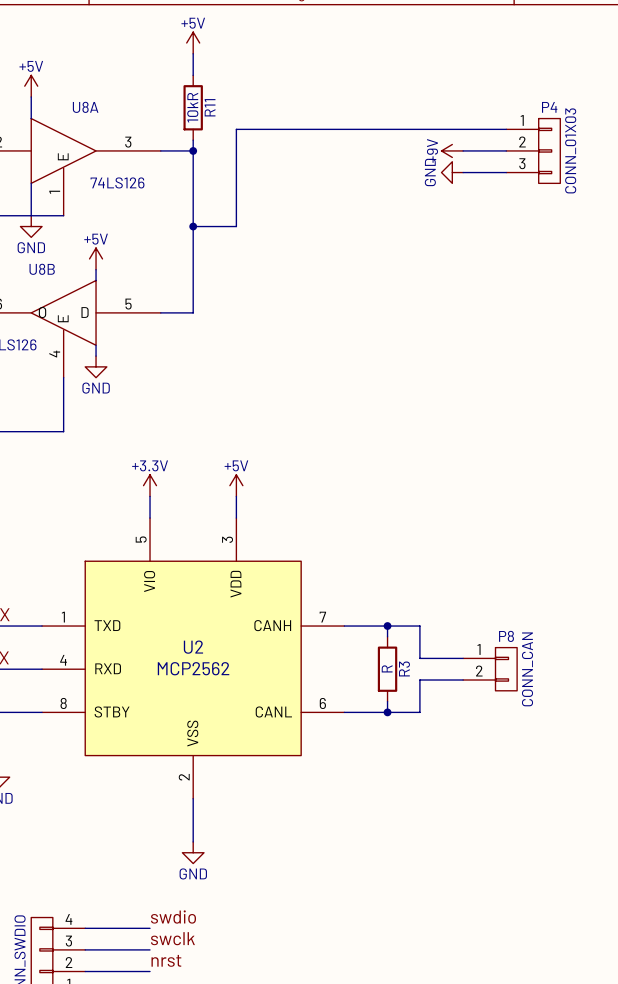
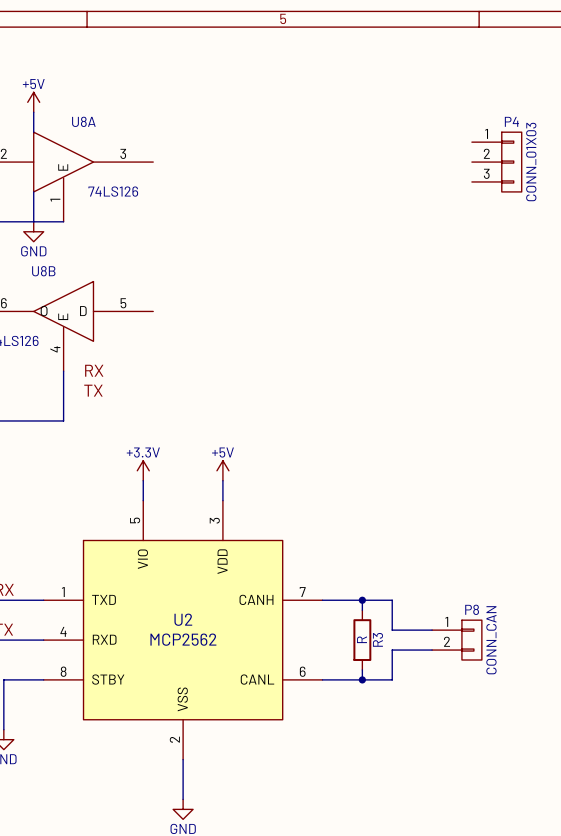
power symbol: +5V (193, 42) -> none
wire: (193, 53) (193, 75) -> none
R11: 10kR (193, 107) -> none
wire: (506, 129) (236, 129) (236, 226) (193, 226) -> none
wire: (193, 140) (193, 312) (160, 312) -> none
wire: (160, 150) (193, 150) -> none
junction: (193, 150) -> none
power symbol: +9V (452, 150) -> none
wire: (463, 150) (506, 150) -> none
power symbol: GND (452, 172) -> none
wire: (463, 172) (506, 172) -> none
junction: (193, 226) -> none
power symbol: +5V (96, 258) -> none
wire: (96, 269) (96, 280) -> none
wire: (96, 345) (96, 356) -> none
power symbol: GND (96, 366) -> none
label: none -> RX (94, 370)
label: none -> TX (93, 390)

